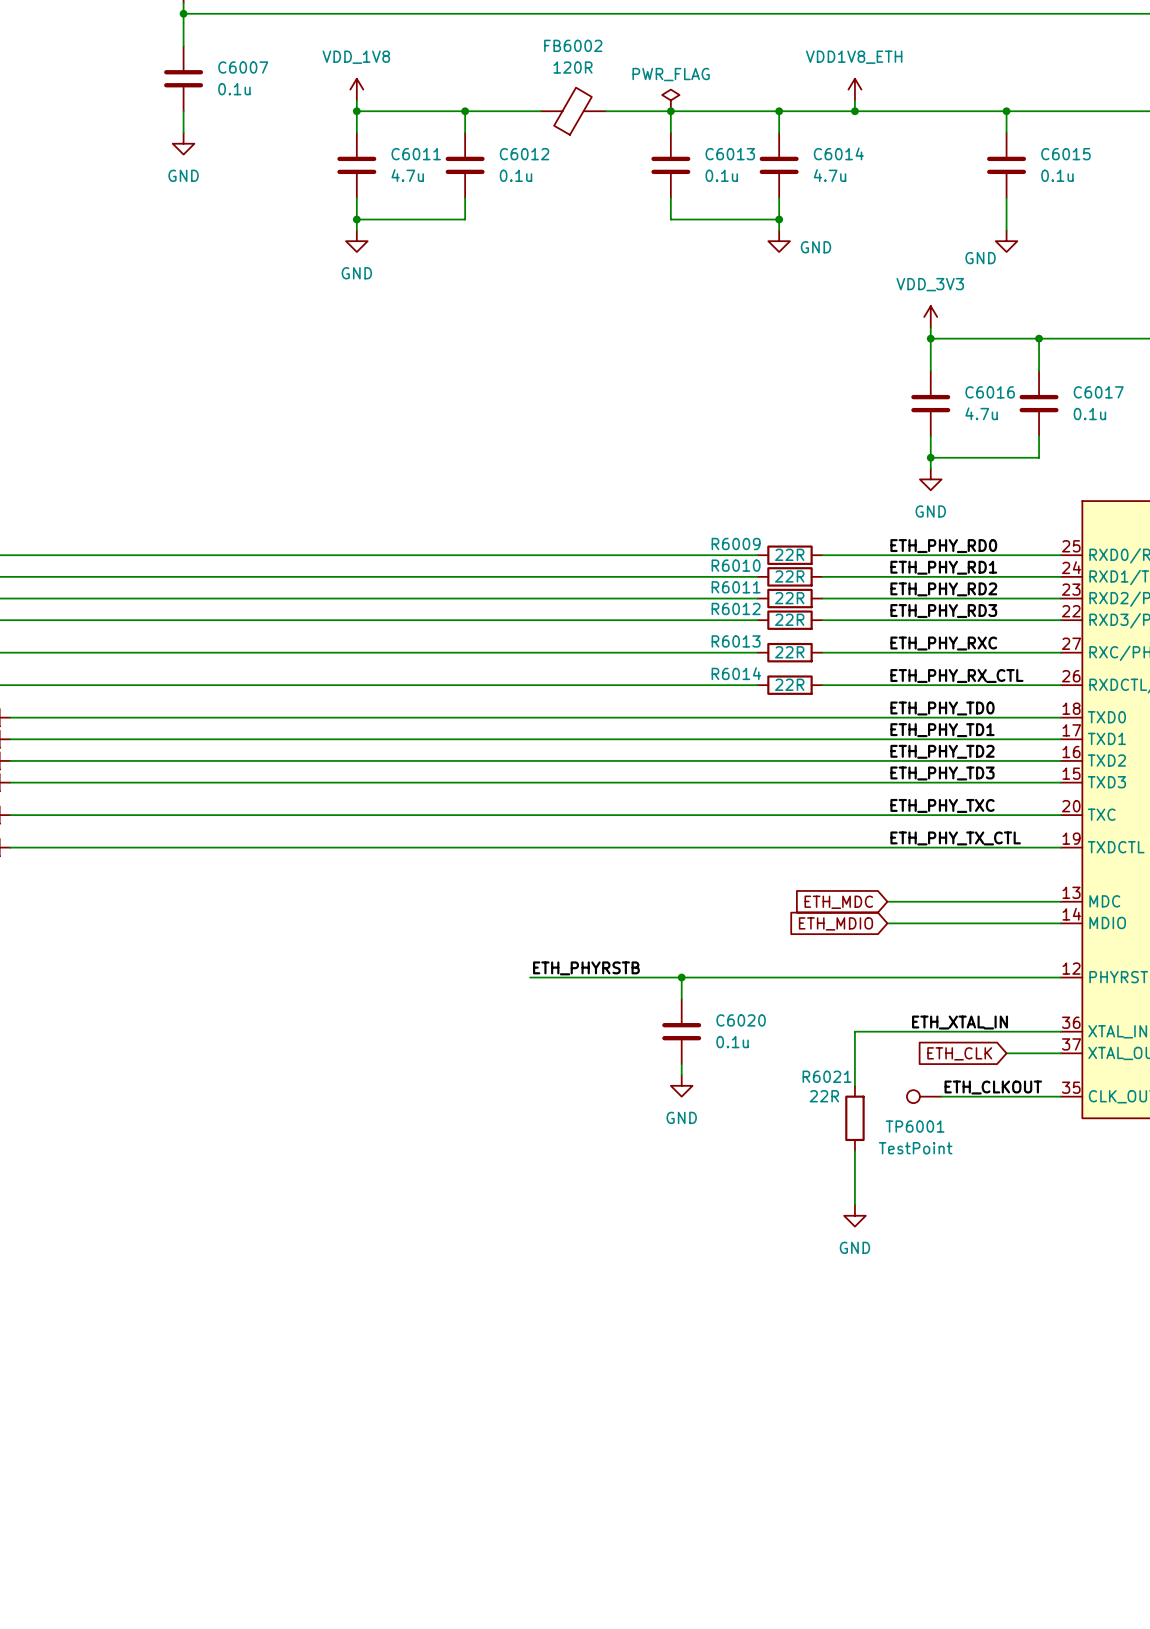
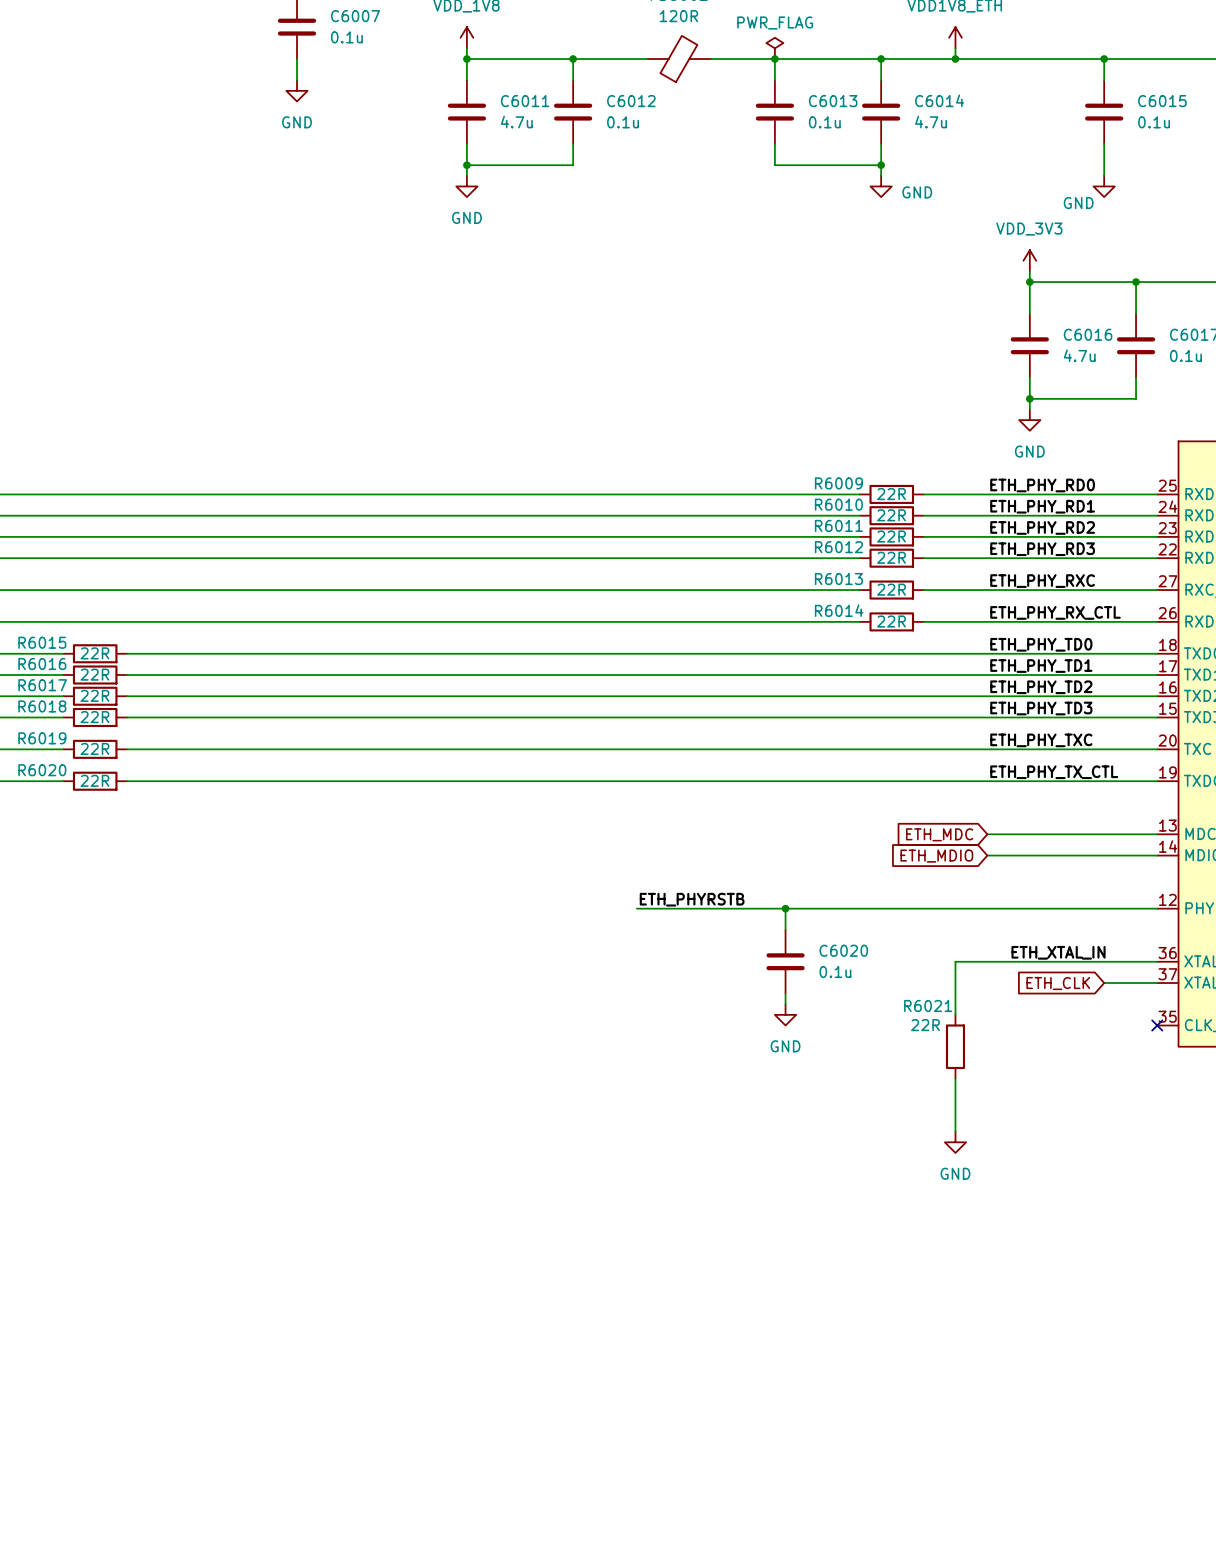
label: ETH_CLKOUT (993, 1087) -> none
TP6001: TestPoint (924, 1096) -> none
wire: (941, 1096) (1060, 1096) -> none
no-connect mark: none -> (1157, 1025)

